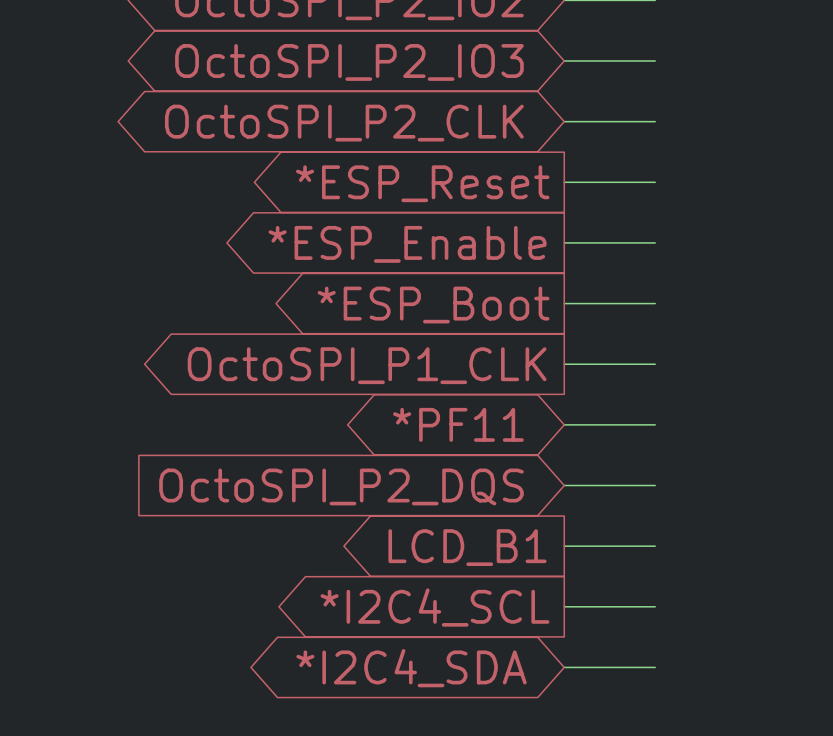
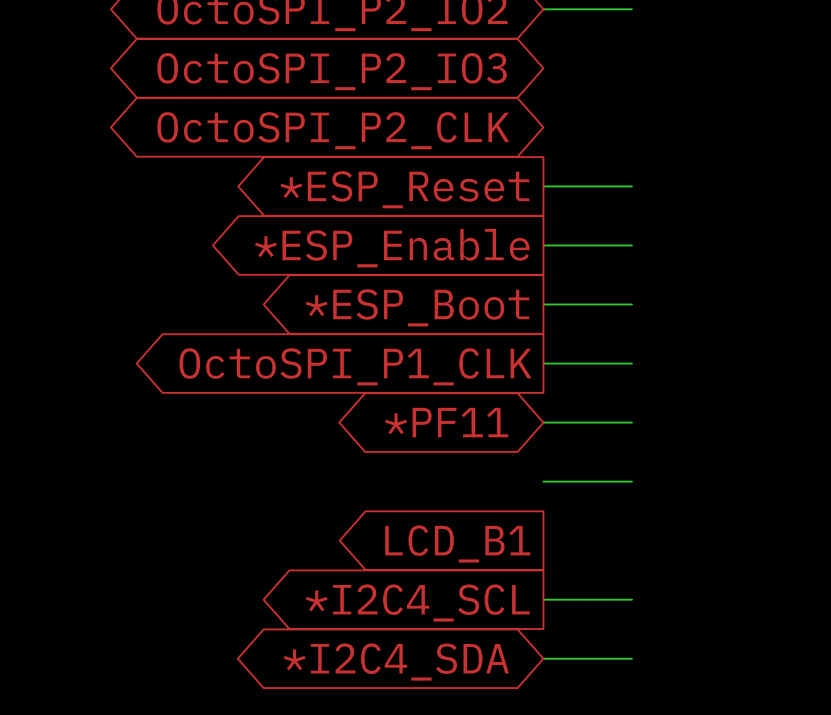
wire: (564, 61) (655, 61) -> none
wire: (564, 121) (655, 121) -> none
global label: OctoSPI_P2_DQS (341, 486) -> none
wire: (564, 546) (655, 546) -> none

